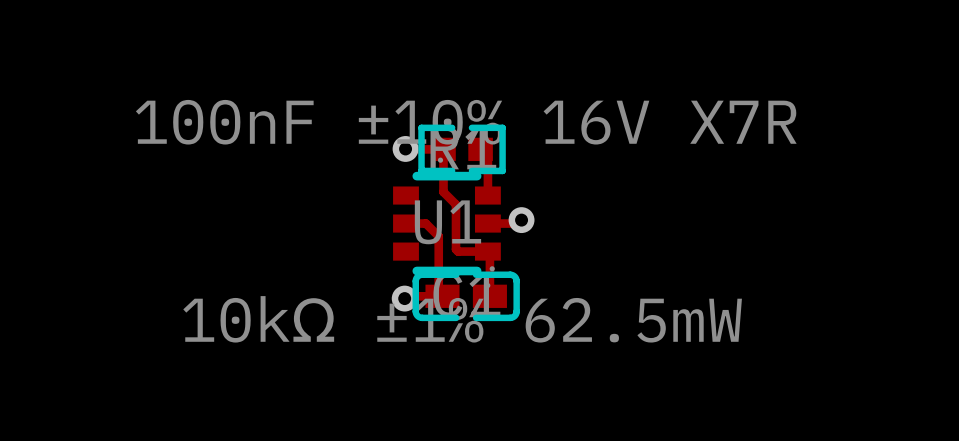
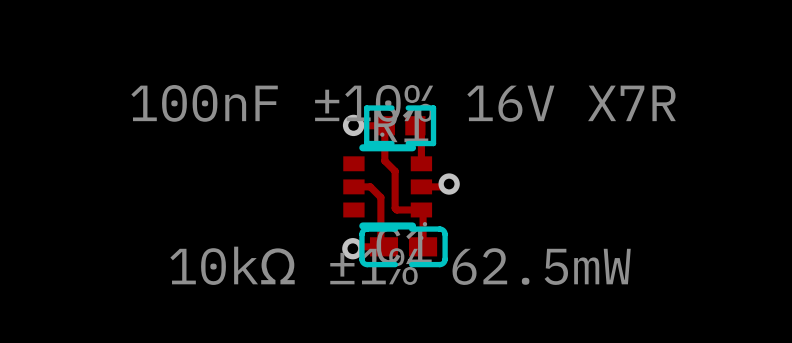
U1 name: U1 (447, 222) -> none

